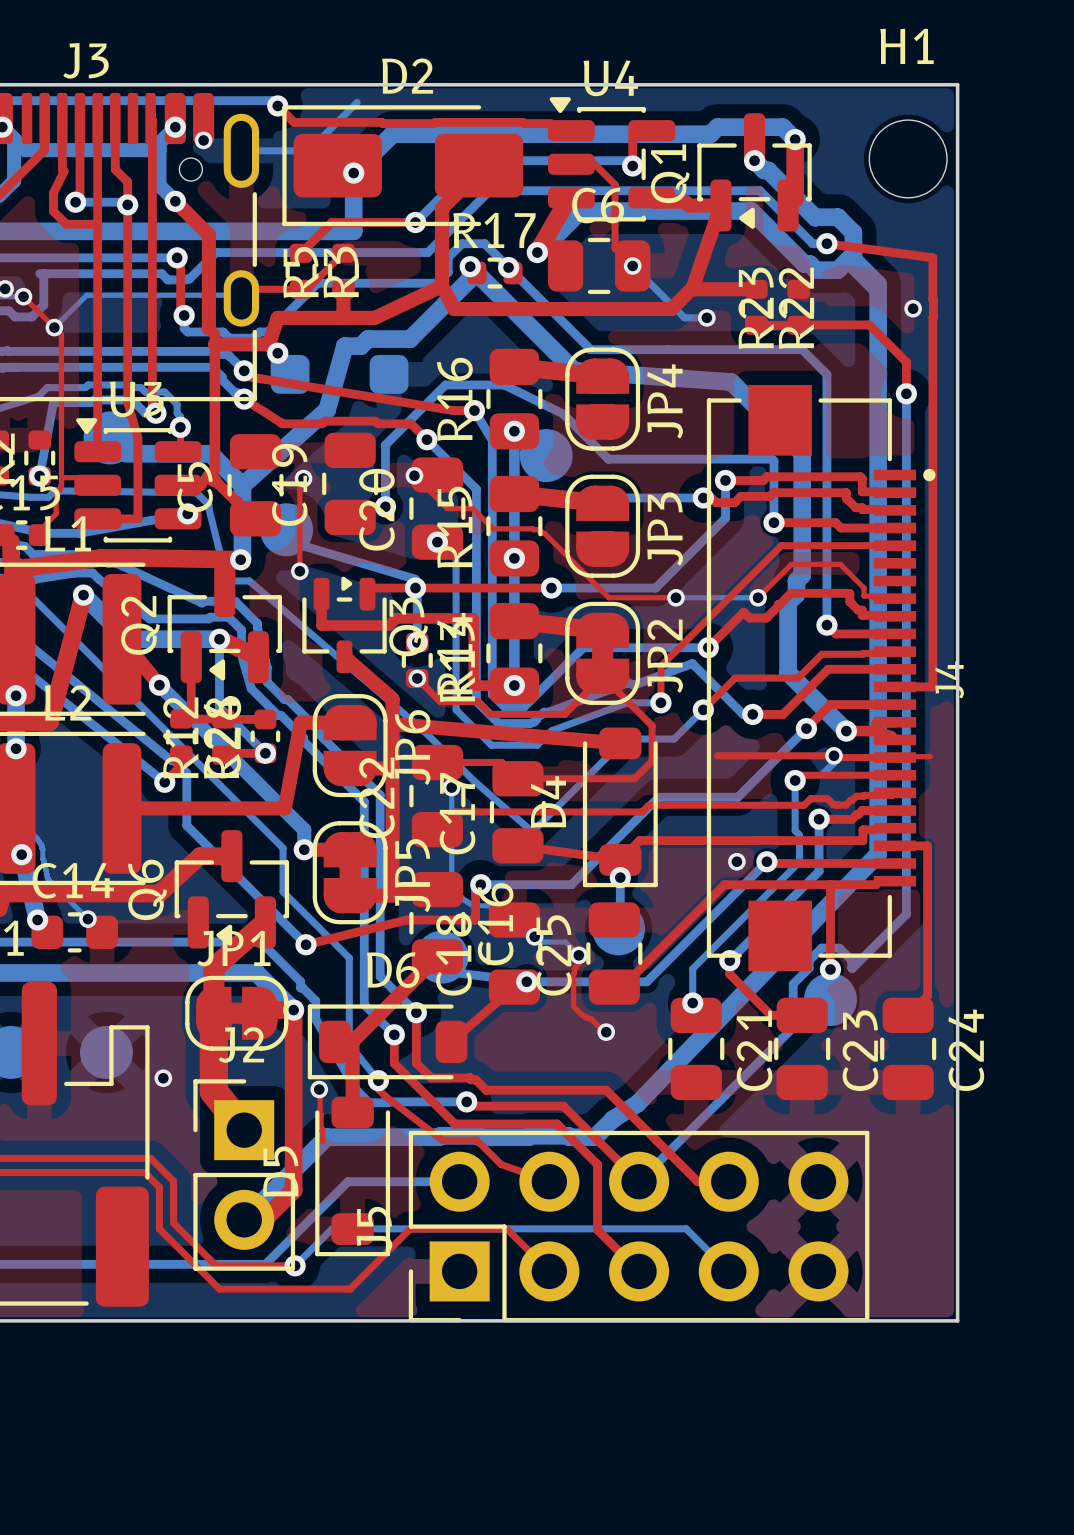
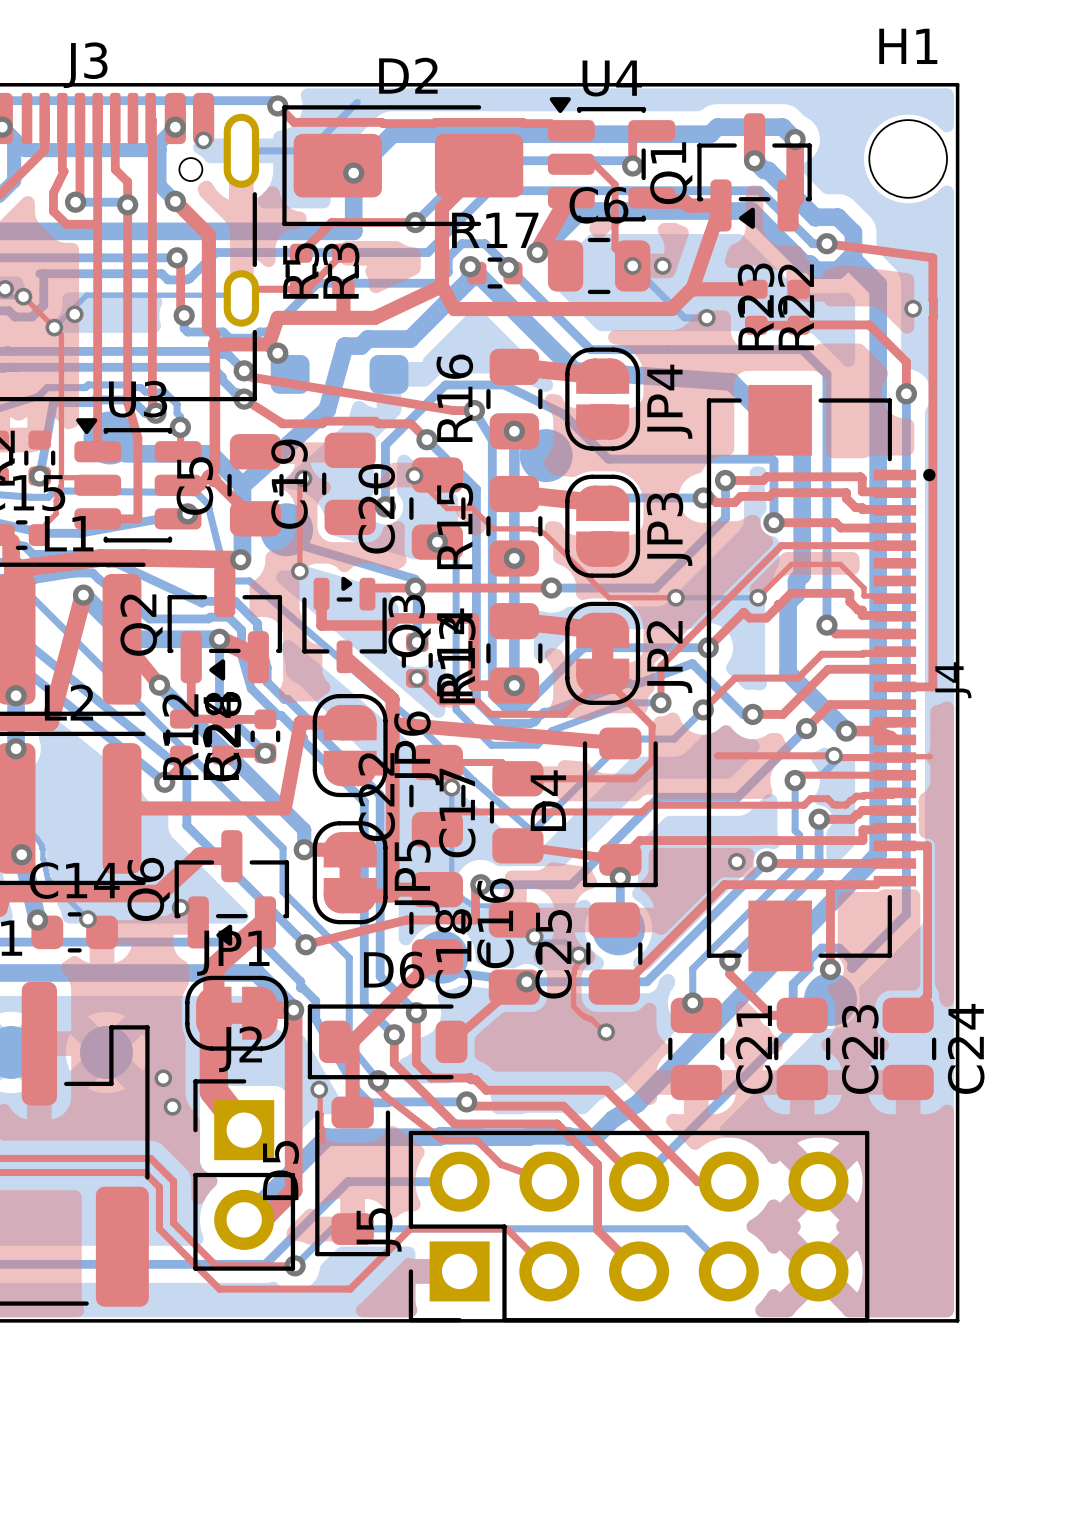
via: none -> (662, 265)
via: none -> (74, 314)
via: none -> (180, 907)
via: none -> (172, 1106)

